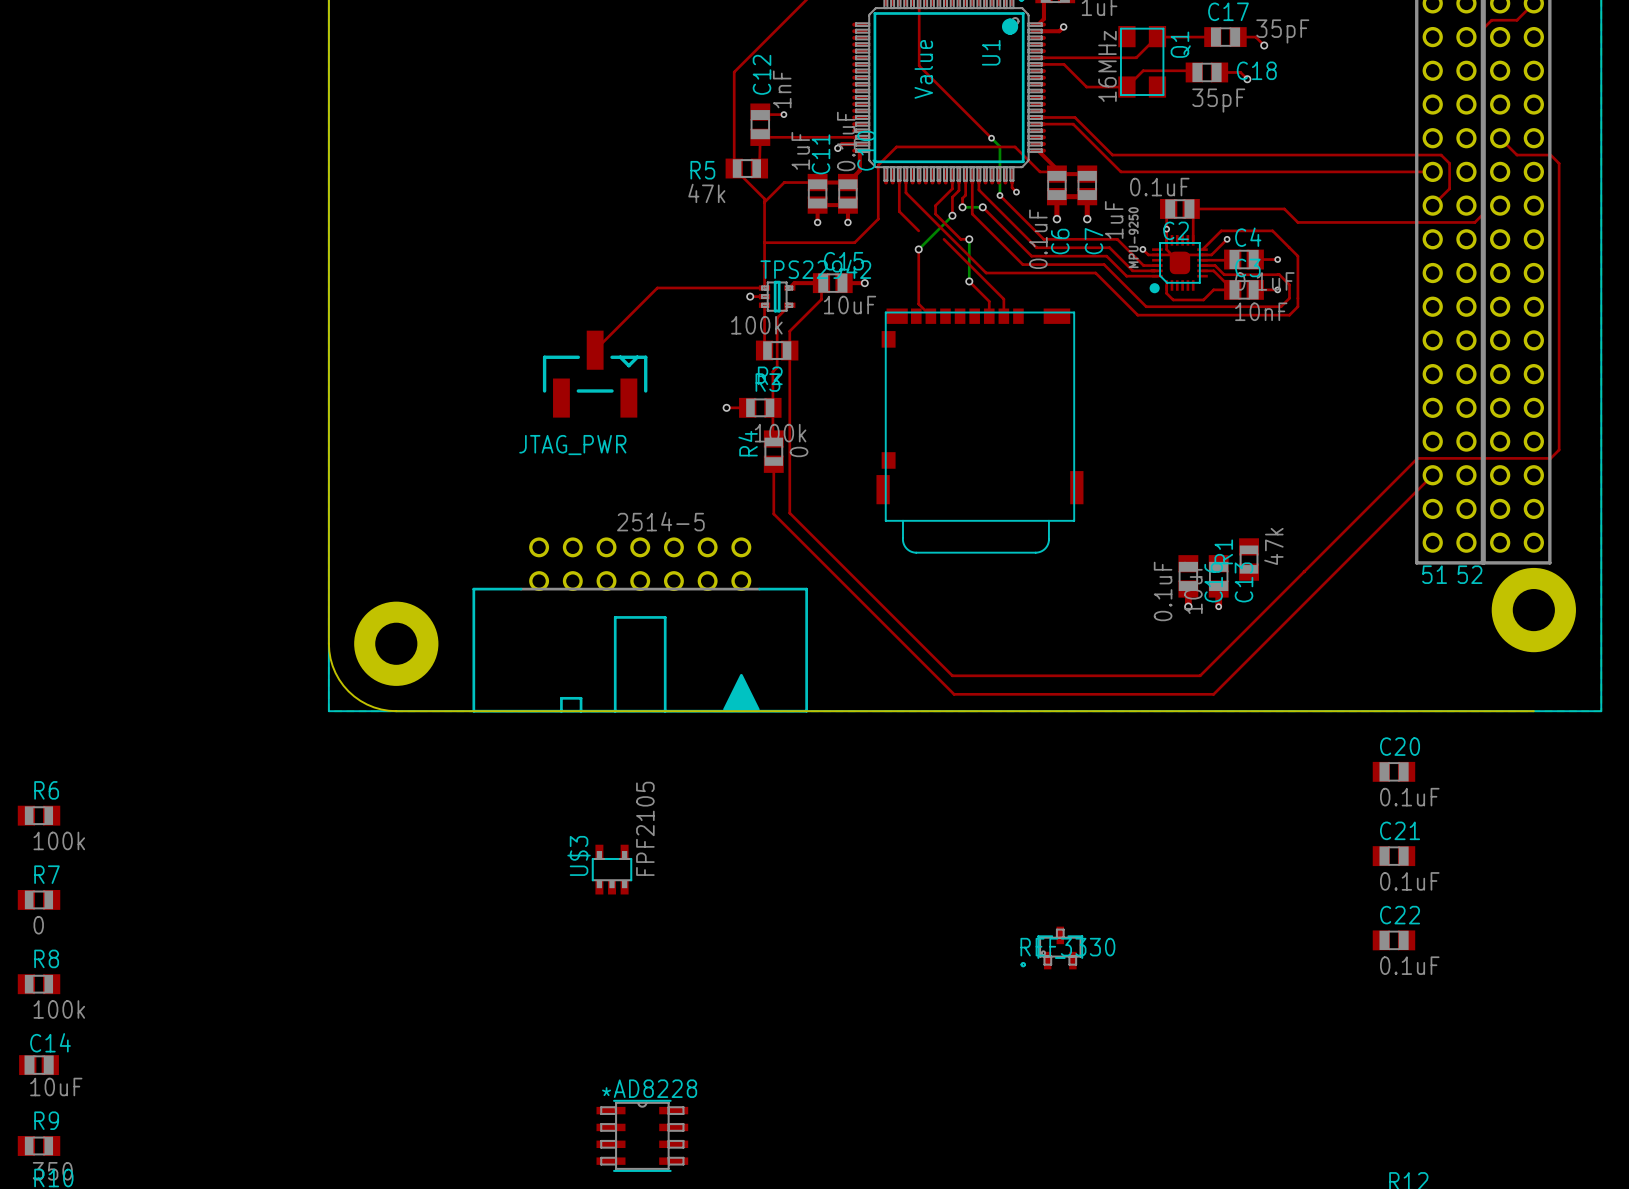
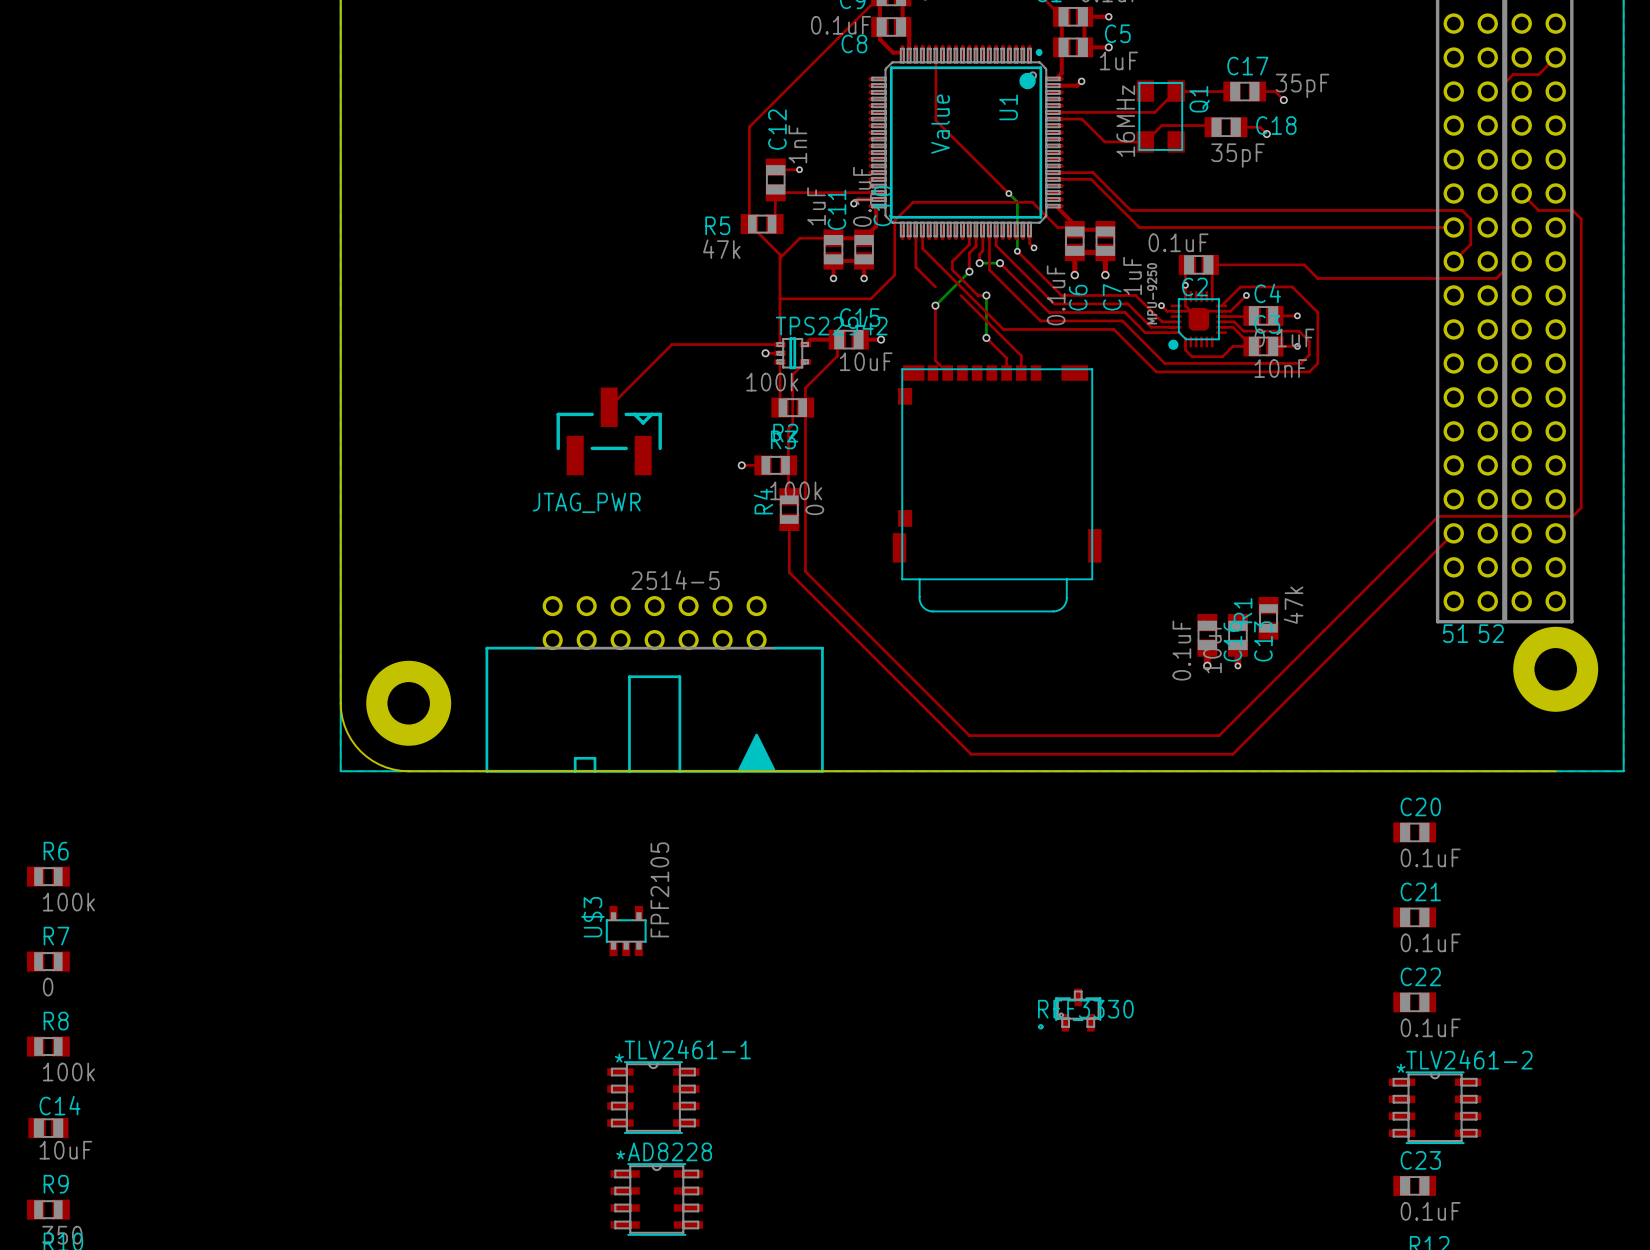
TLV2461-1: none -> (653, 1097)
TLV2461-2: none -> (1435, 1107)
C23: none -> 0.1uF (1414, 1185)

